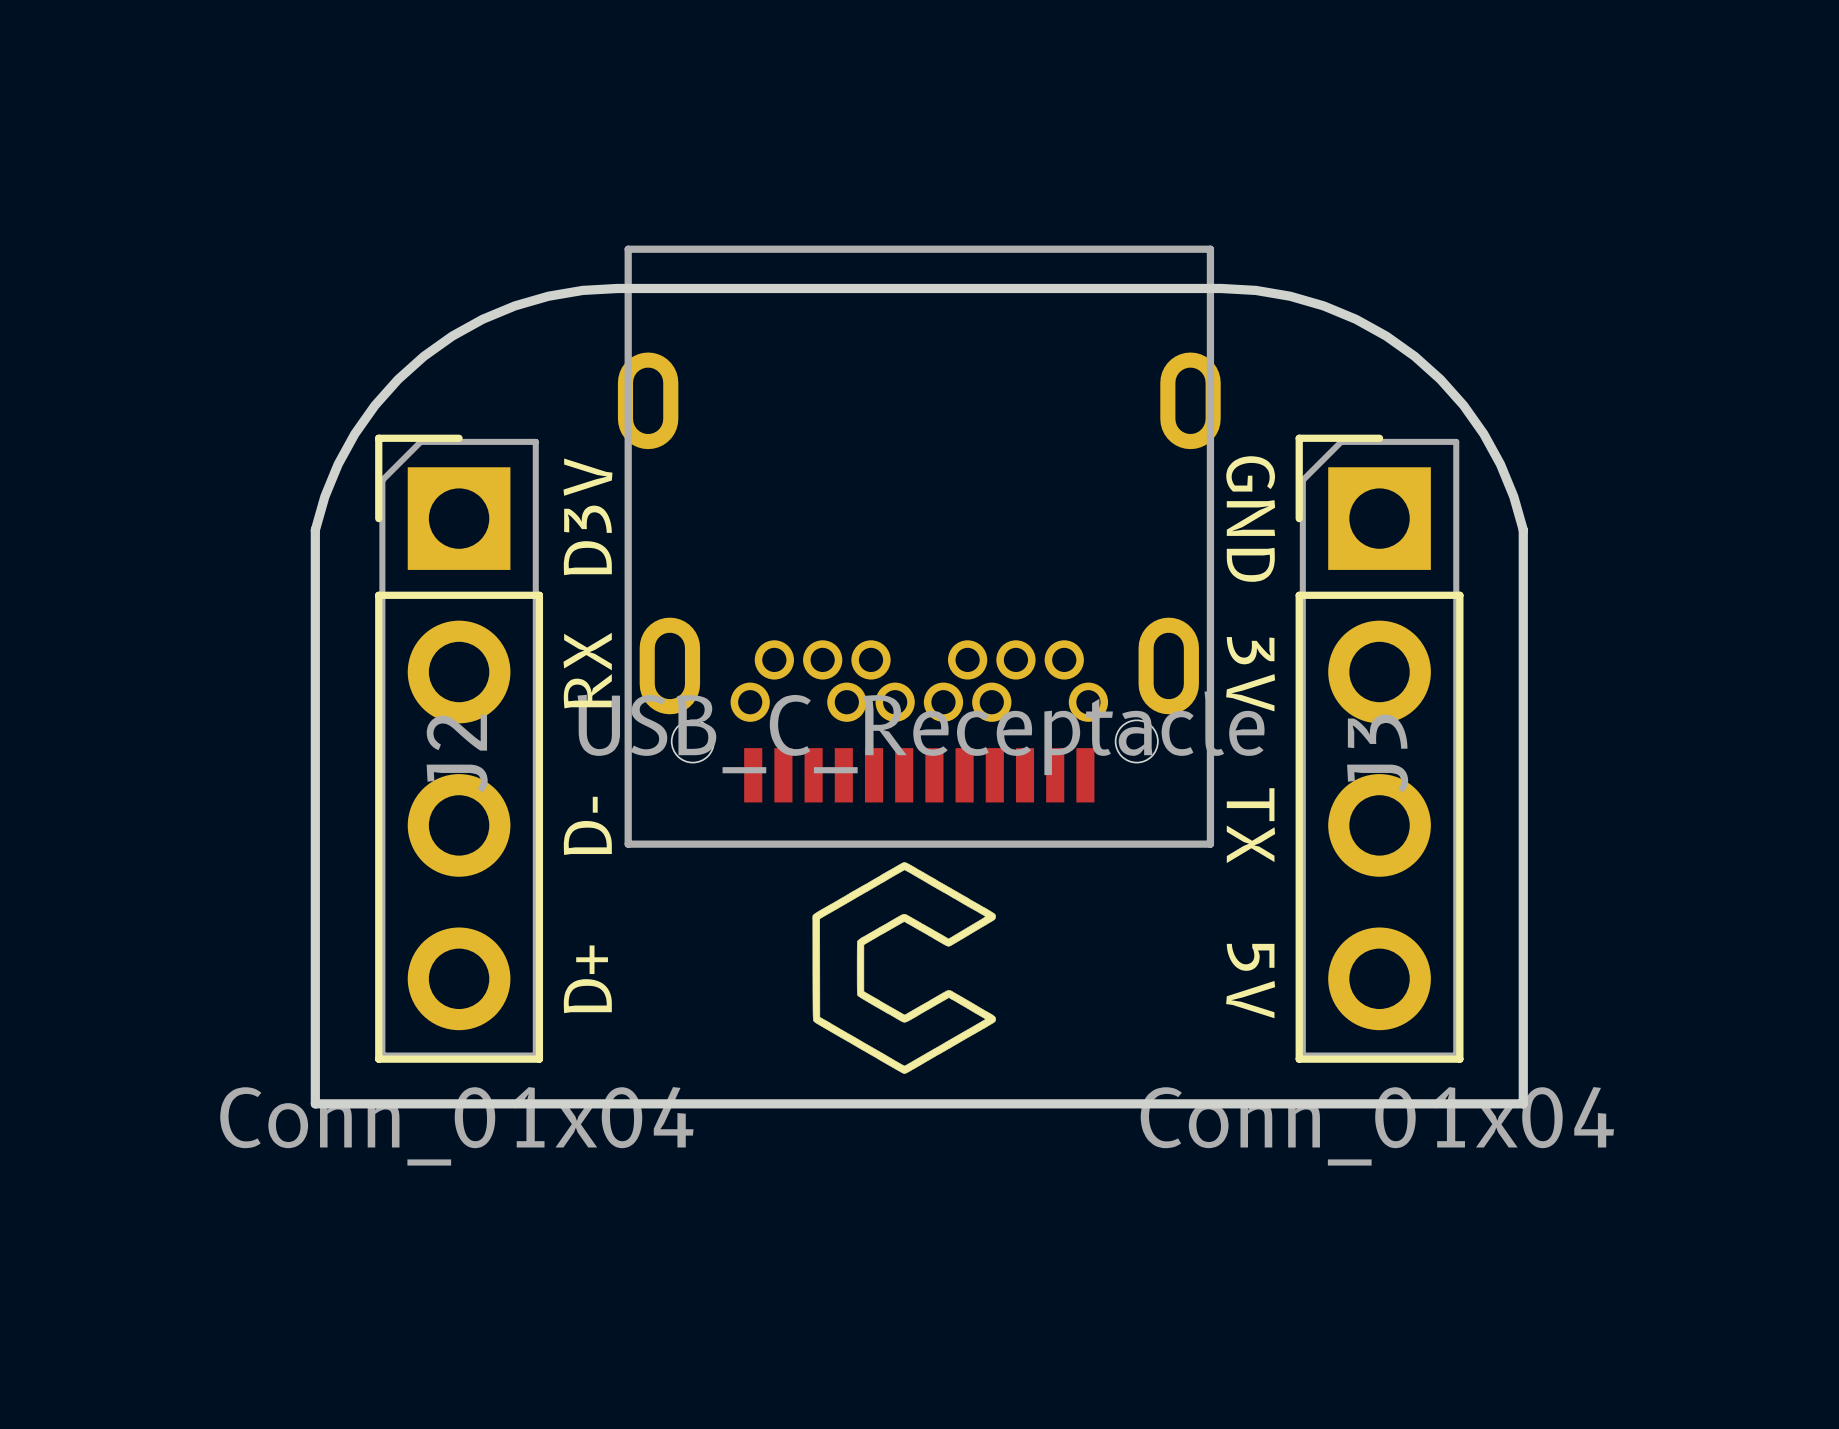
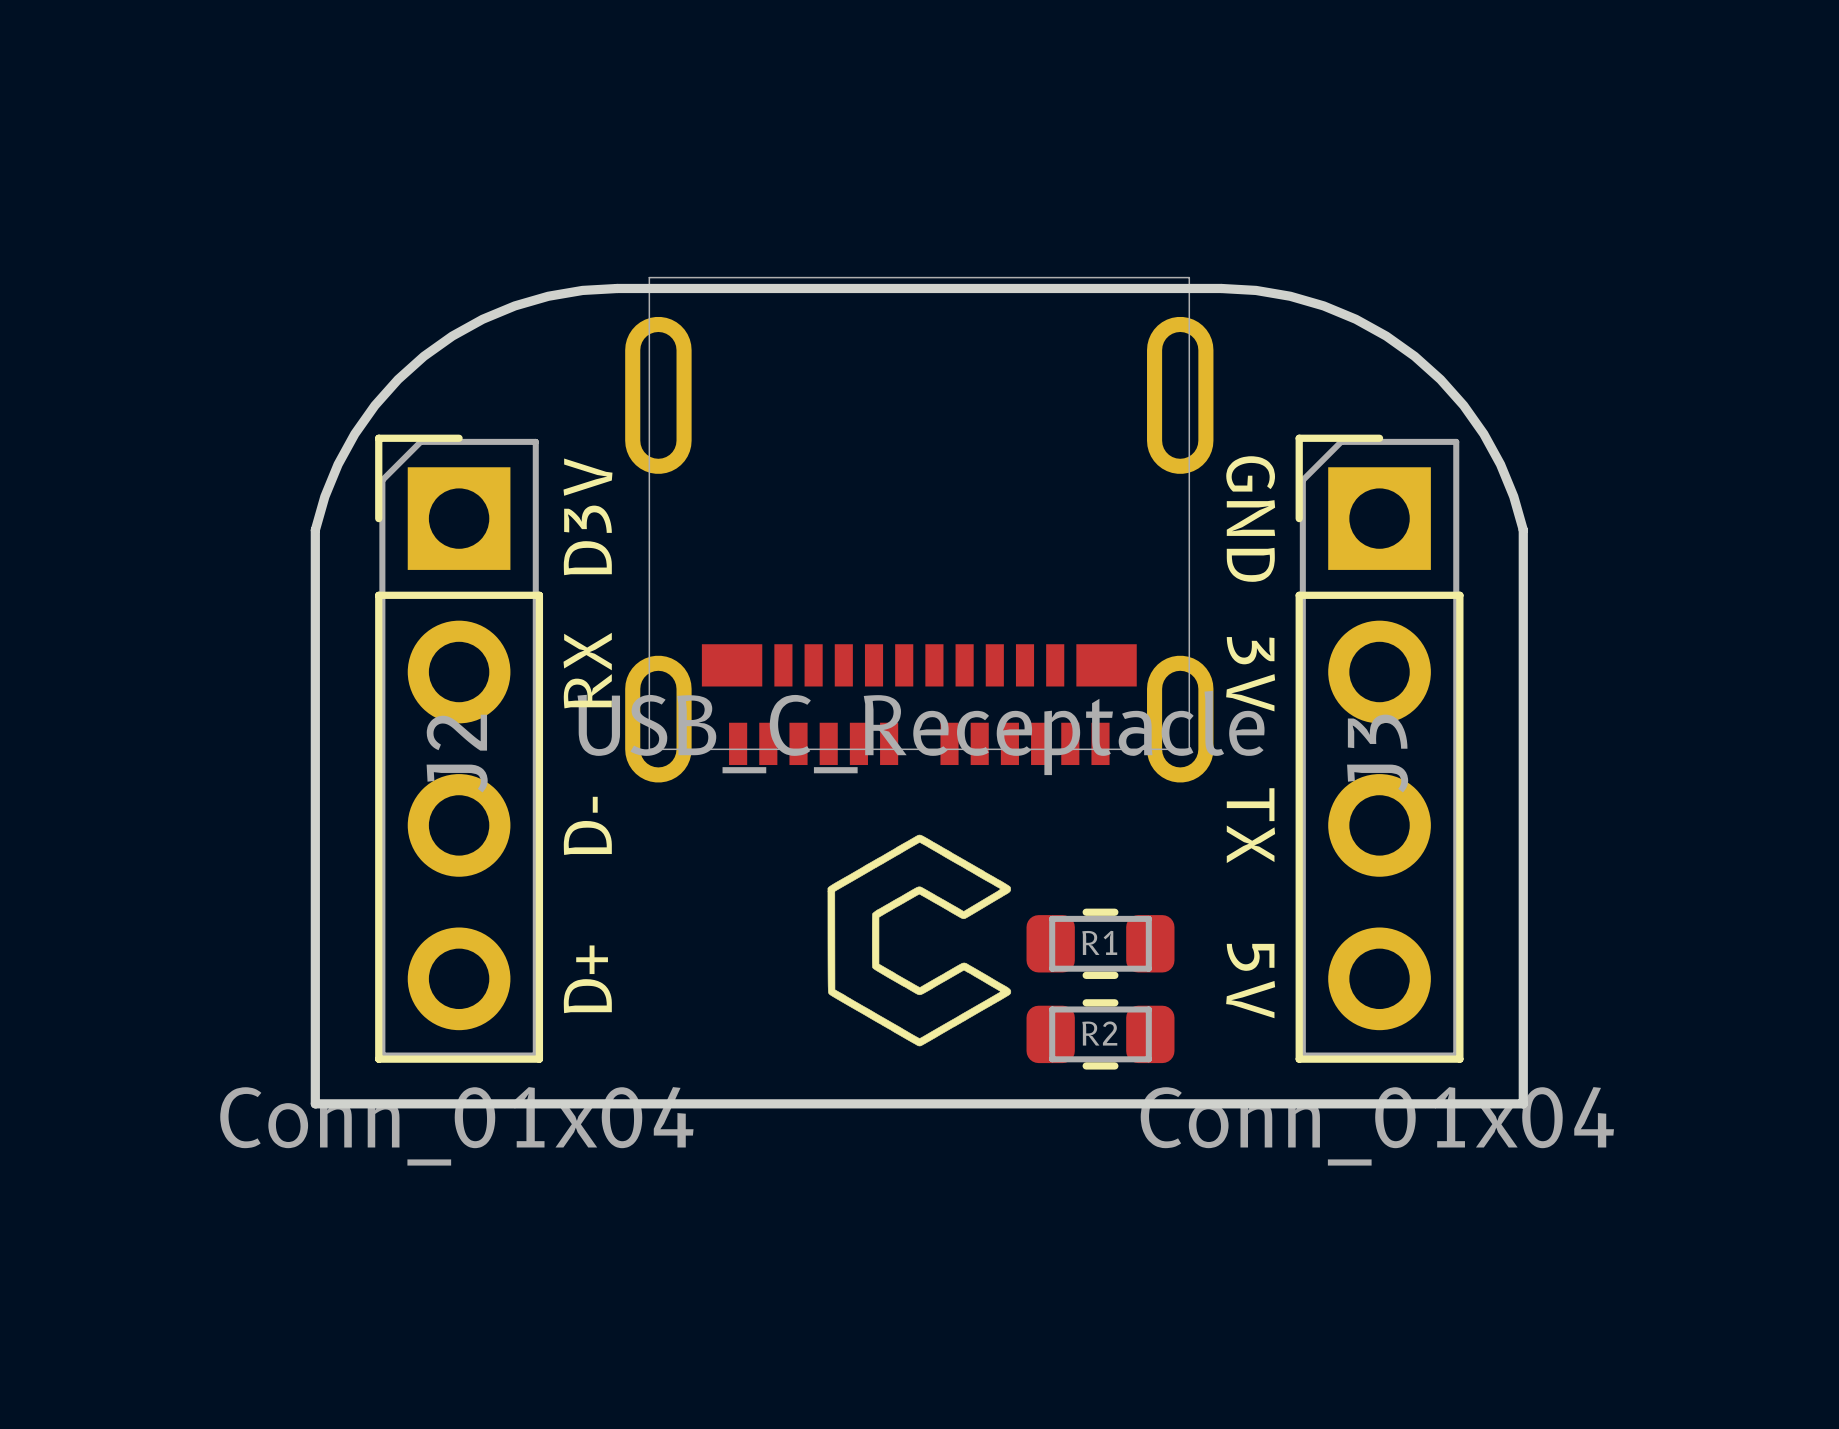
part footprint: [617, 245, 1221, 848] -> [625, 276, 1214, 783]
R1: none -> (1100, 943)
drawing position: (904, 968) -> (919, 940)
R2: none -> (1100, 1034)

